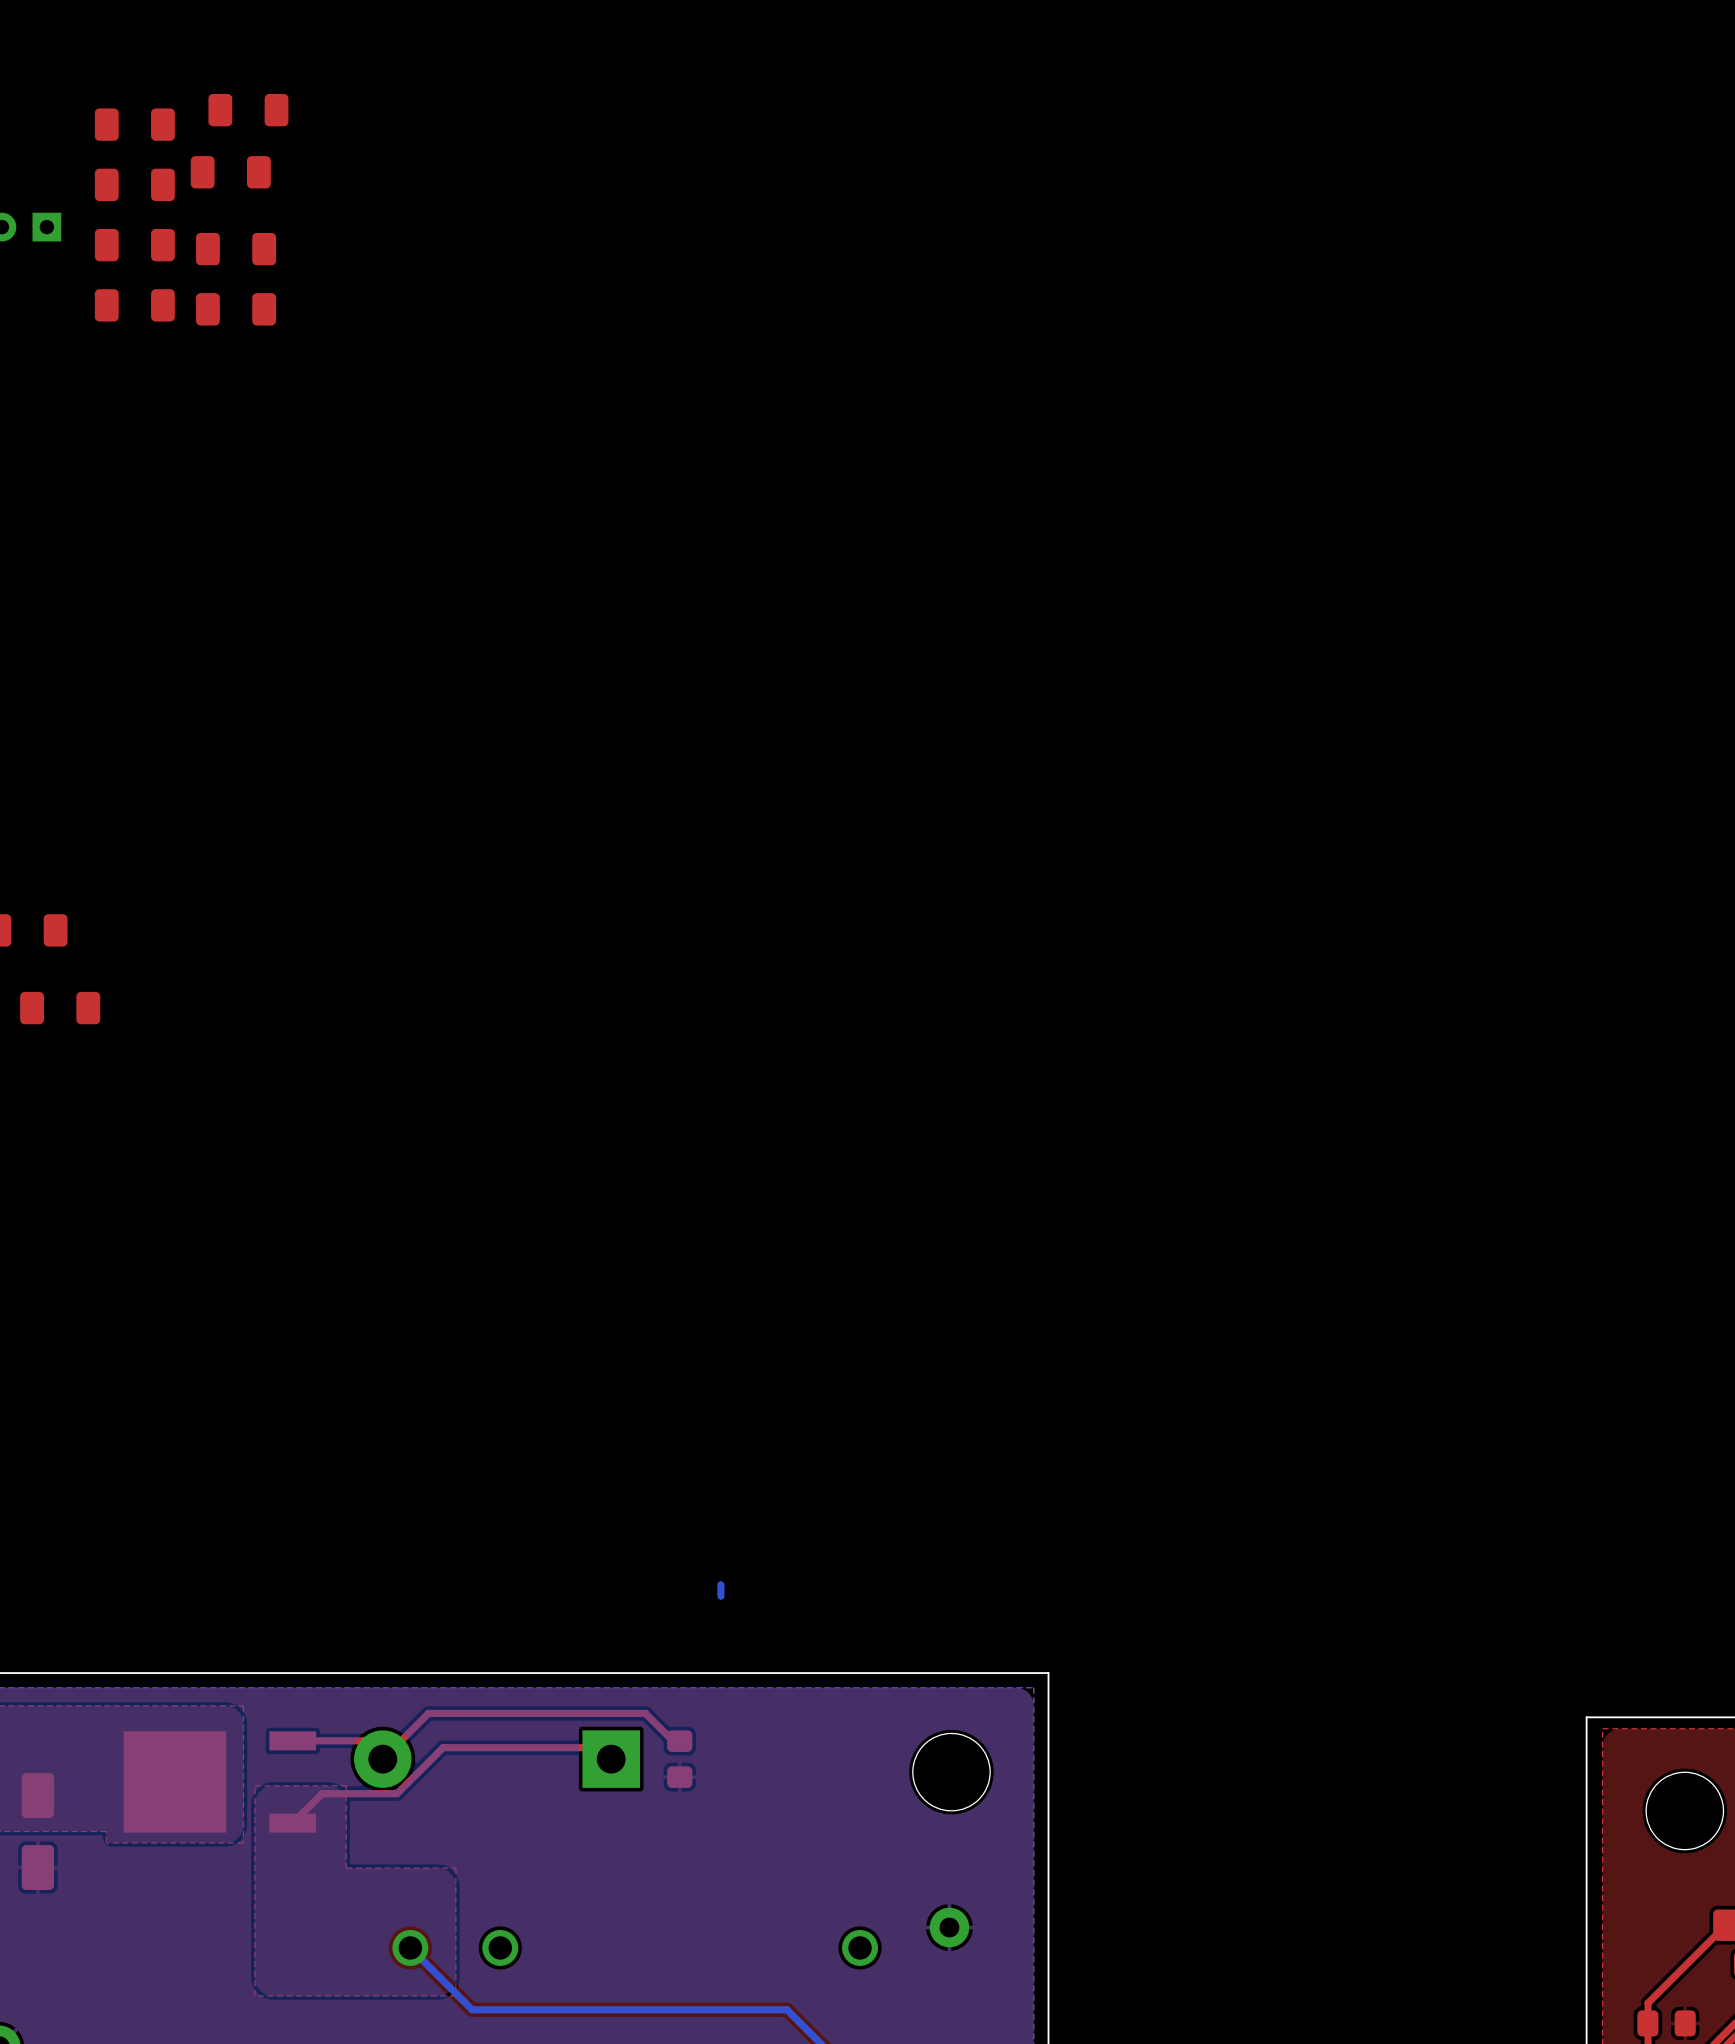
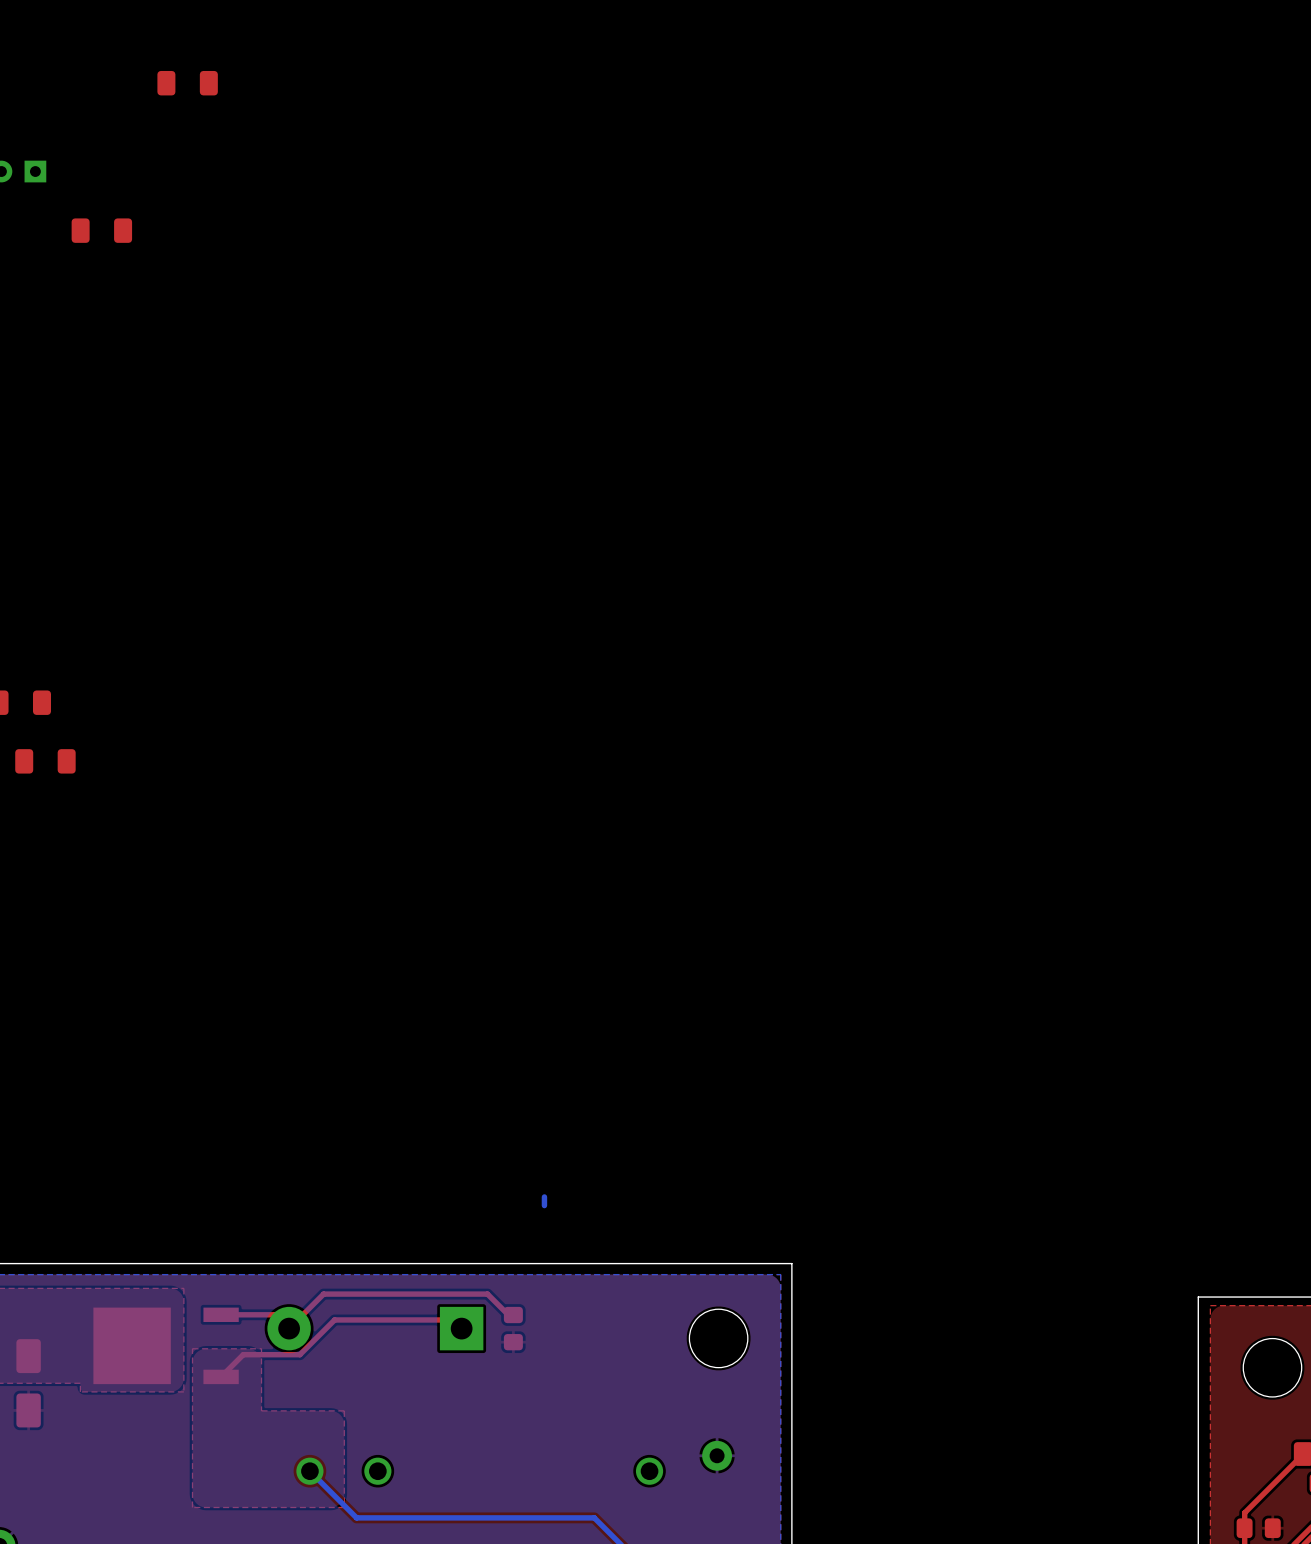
part: (134, 124) -> none
part: (230, 172) -> none
part: (134, 184) -> none
part: (134, 245) -> none
part: (236, 249) -> none
part: (236, 309) -> none

